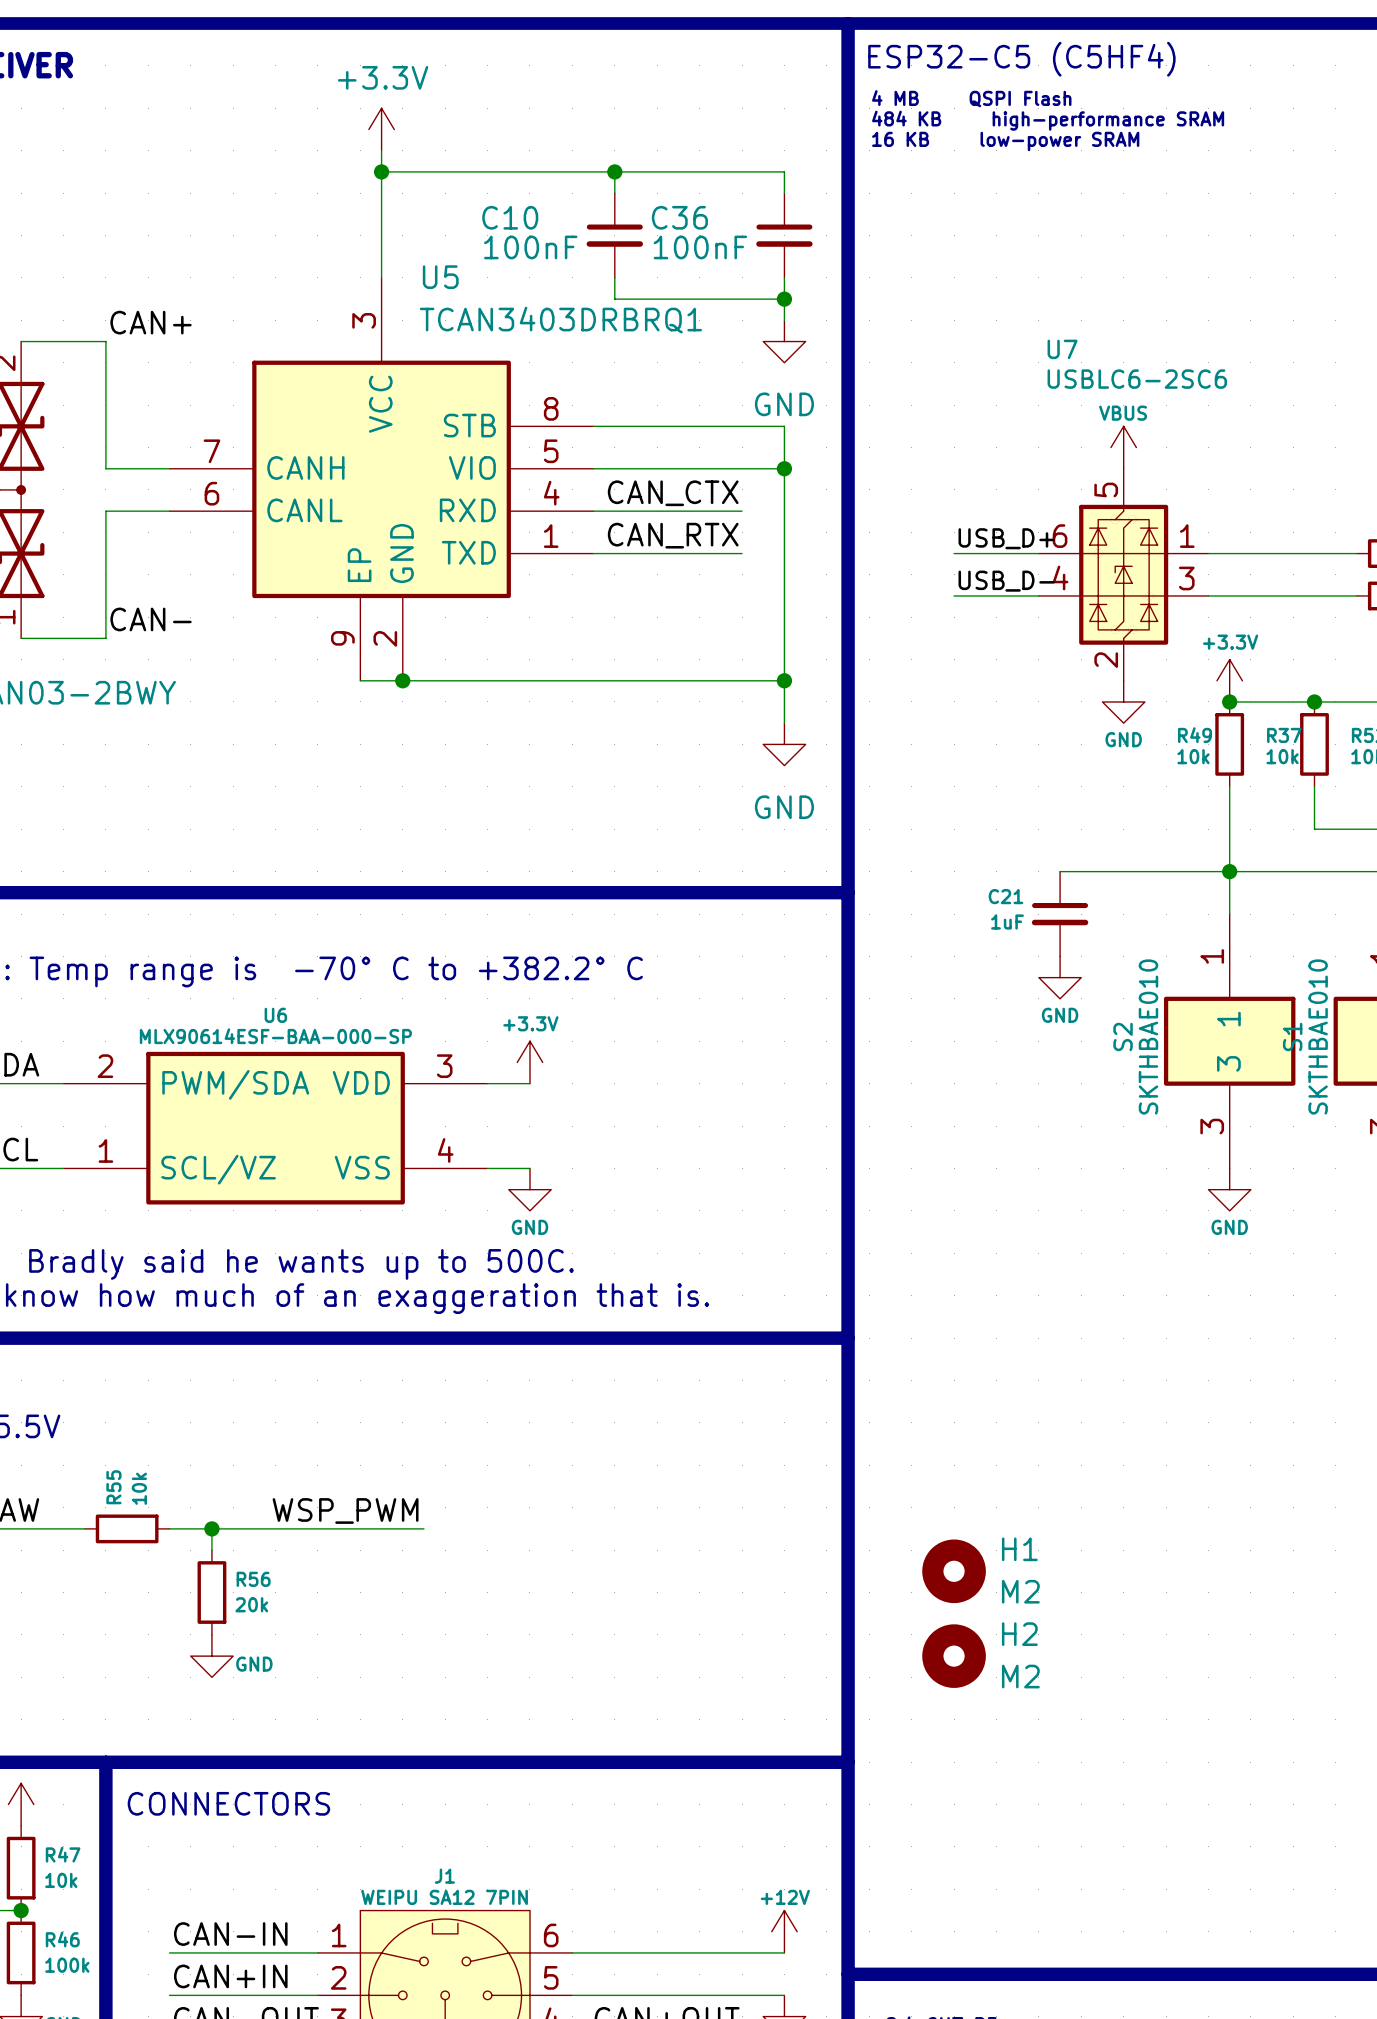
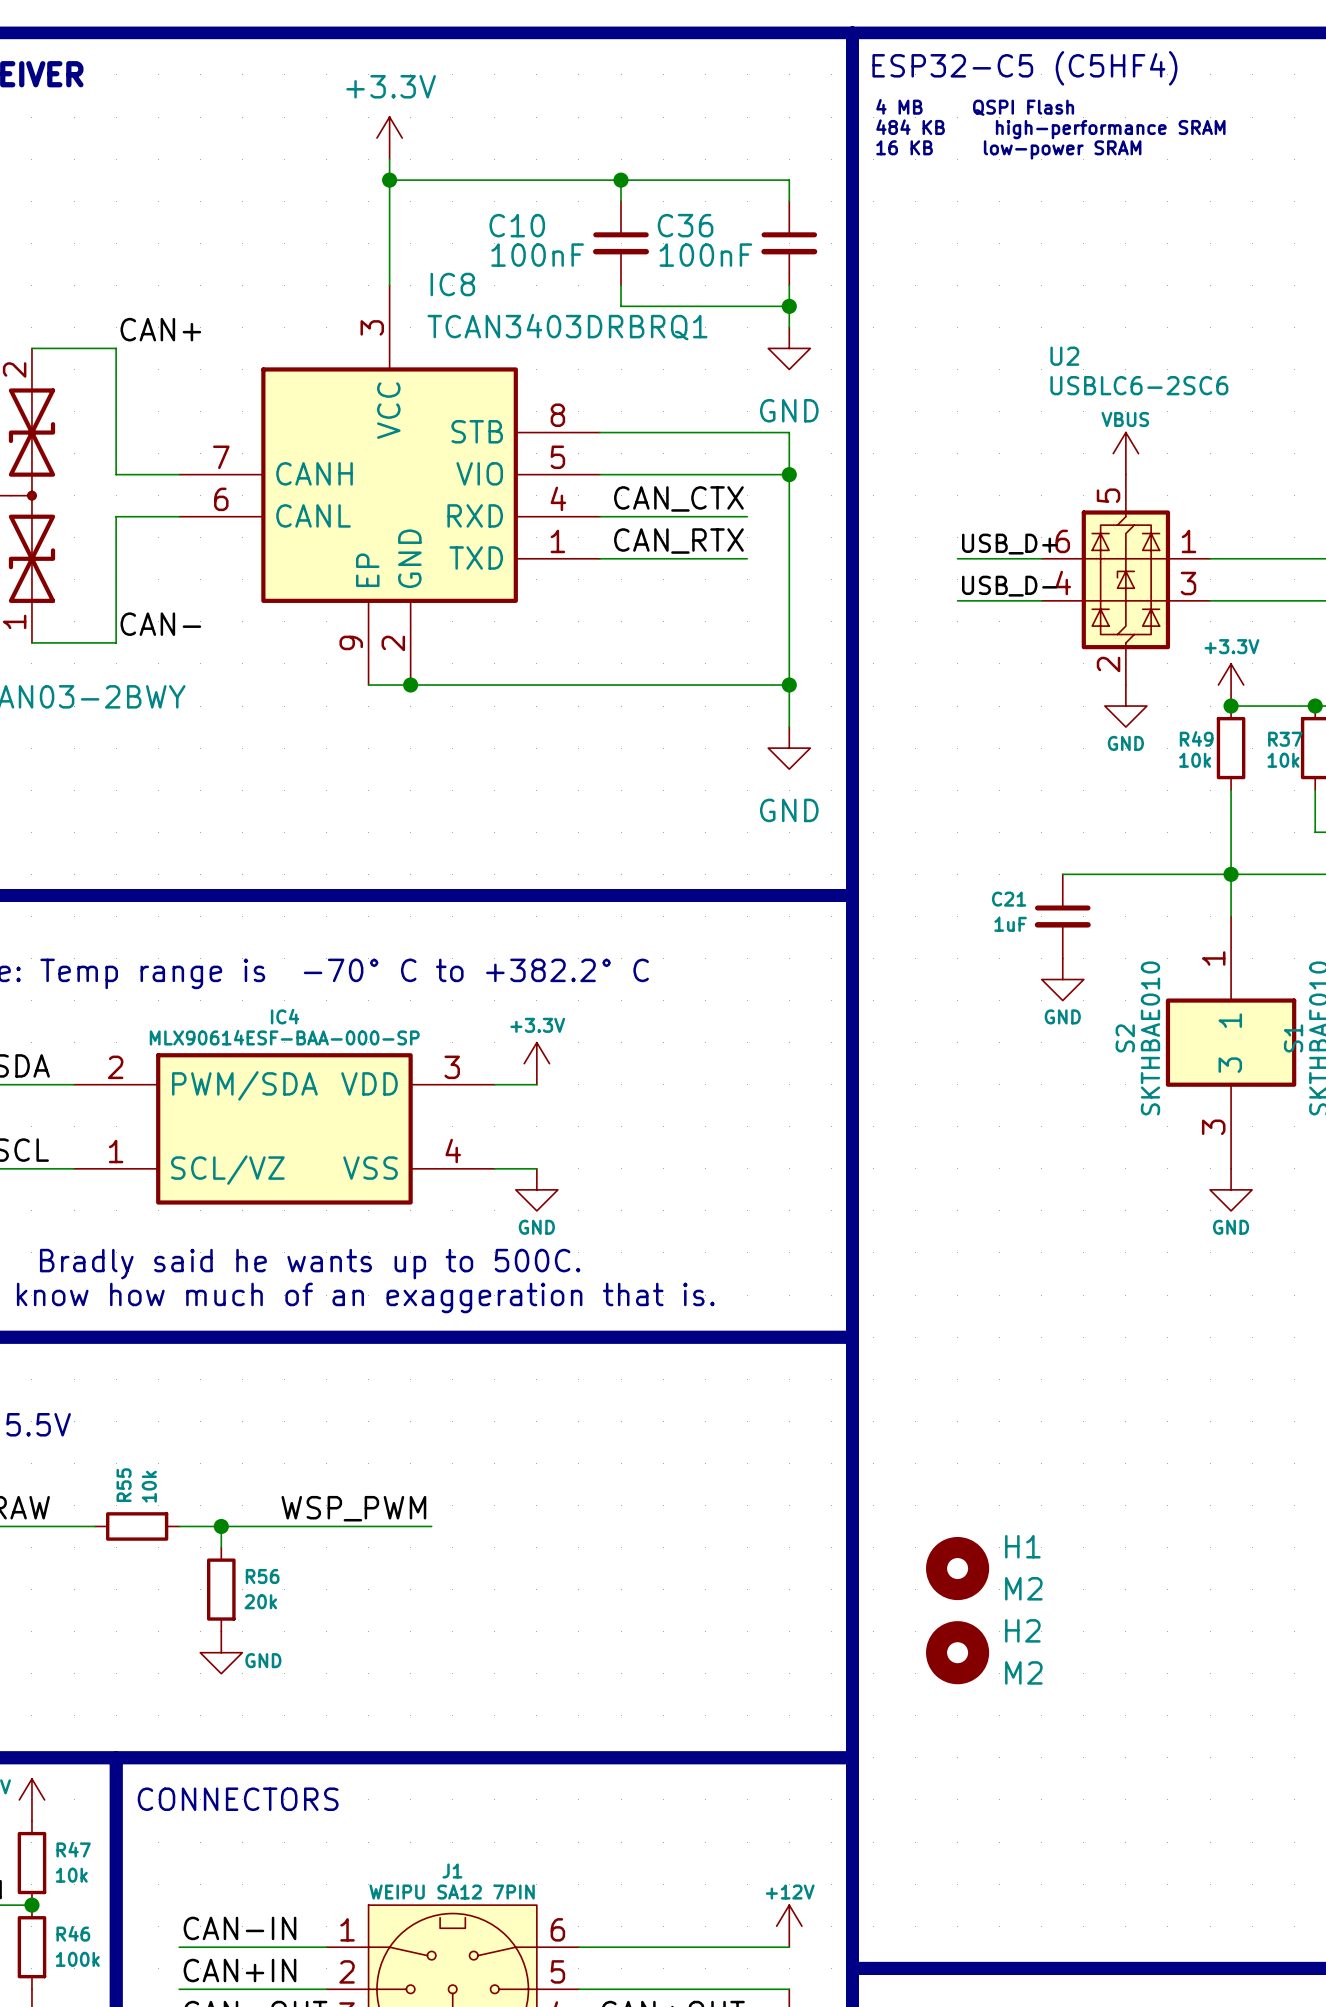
U5 name: U5 (440, 277) -> IC8 (452, 284)
U7 name: U7 (1062, 349) -> U2 (1064, 356)
U6 name: U6 (275, 1015) -> IC4 (285, 1016)

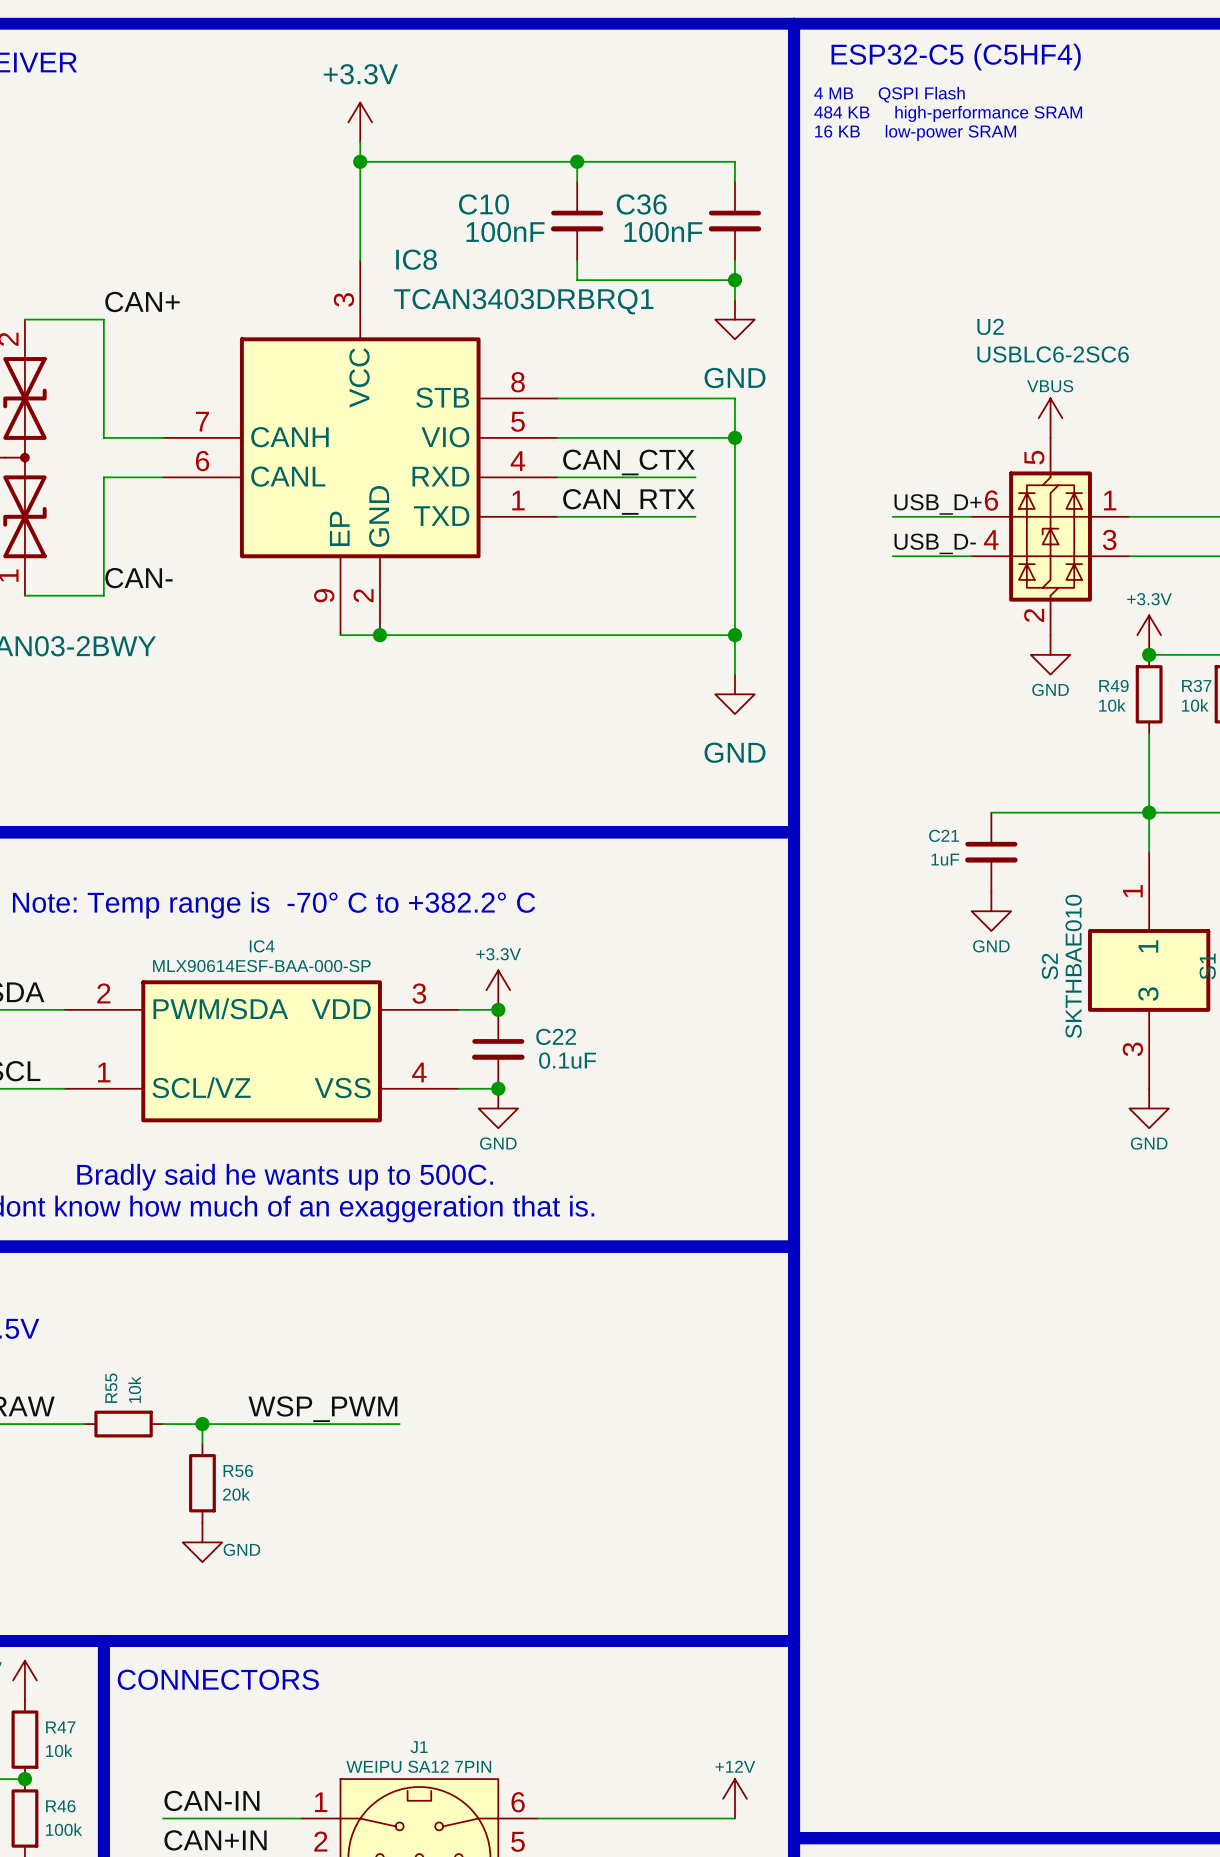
junction: none -> (498, 1009)
C22: none -> 0.1uF (498, 1049)
junction: none -> (498, 1088)
H1: M2 (957, 1568) -> none
H2: M2 (957, 1652) -> none

